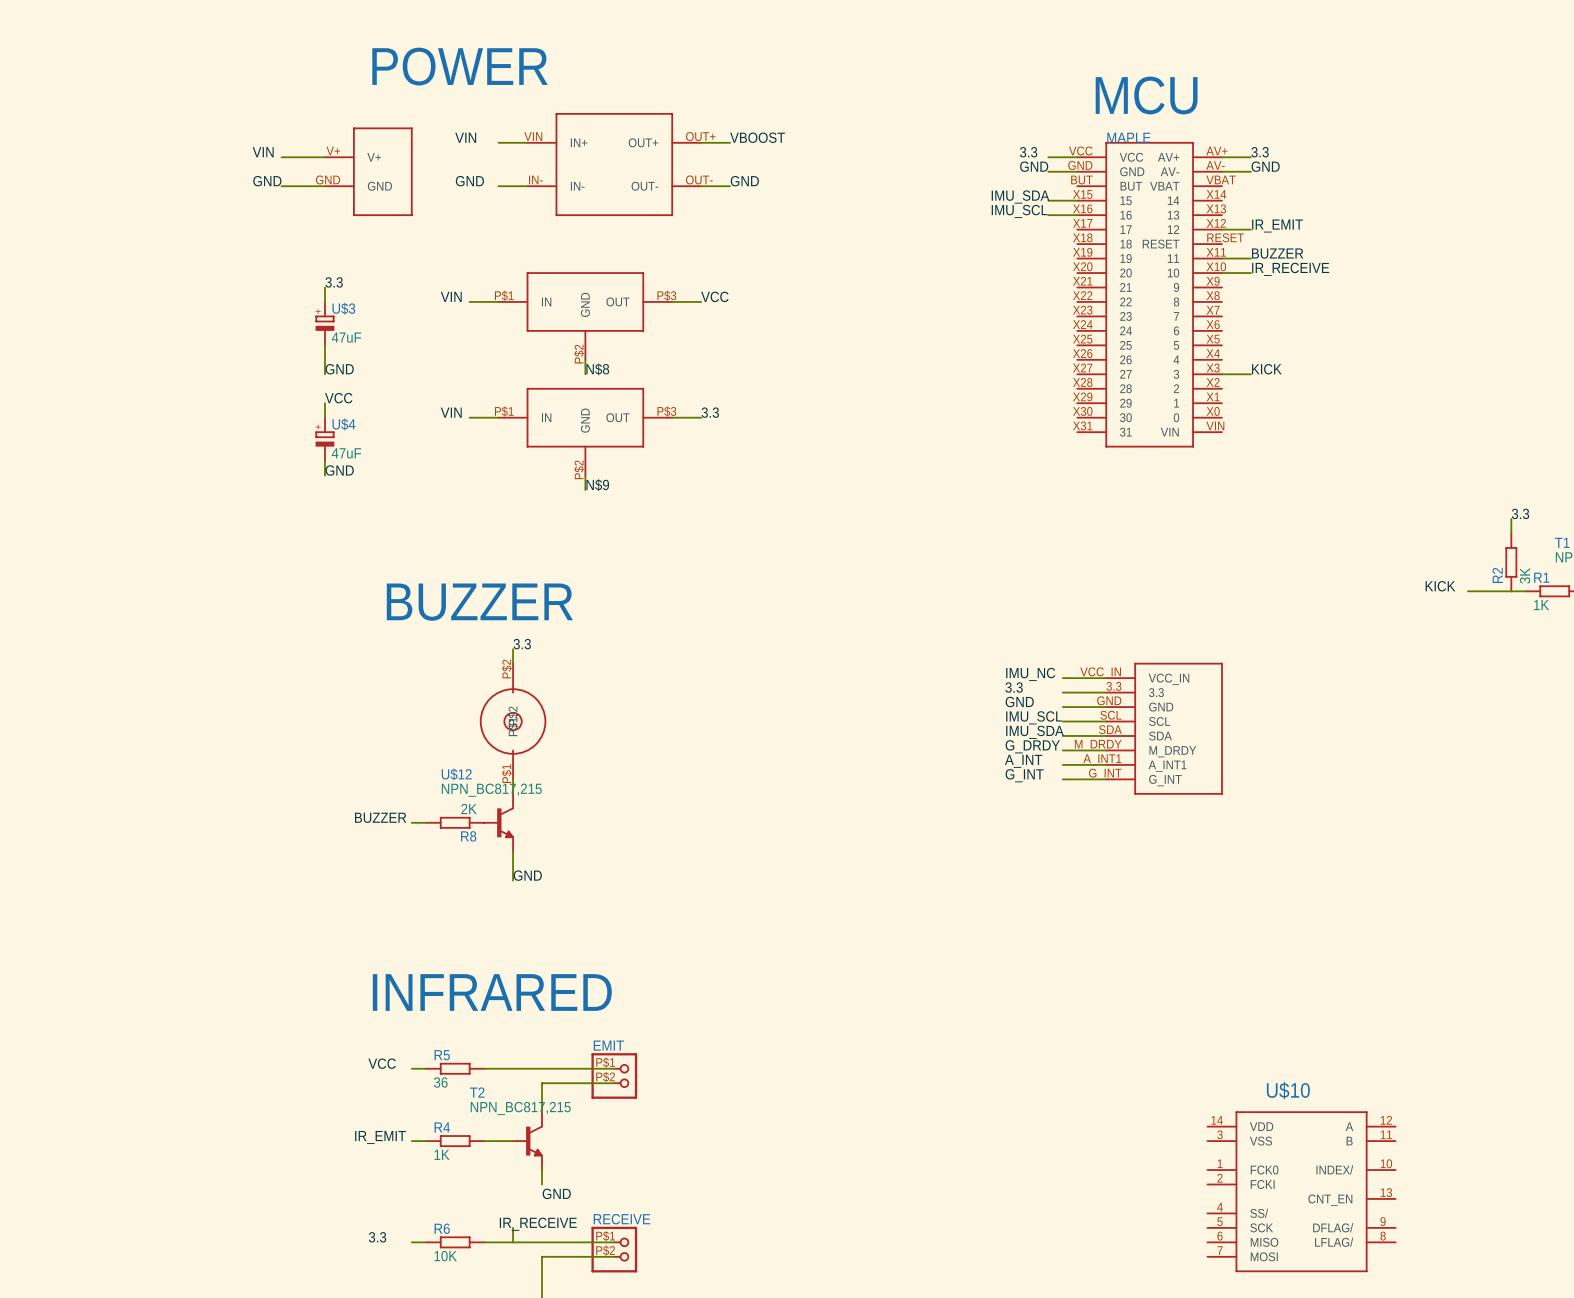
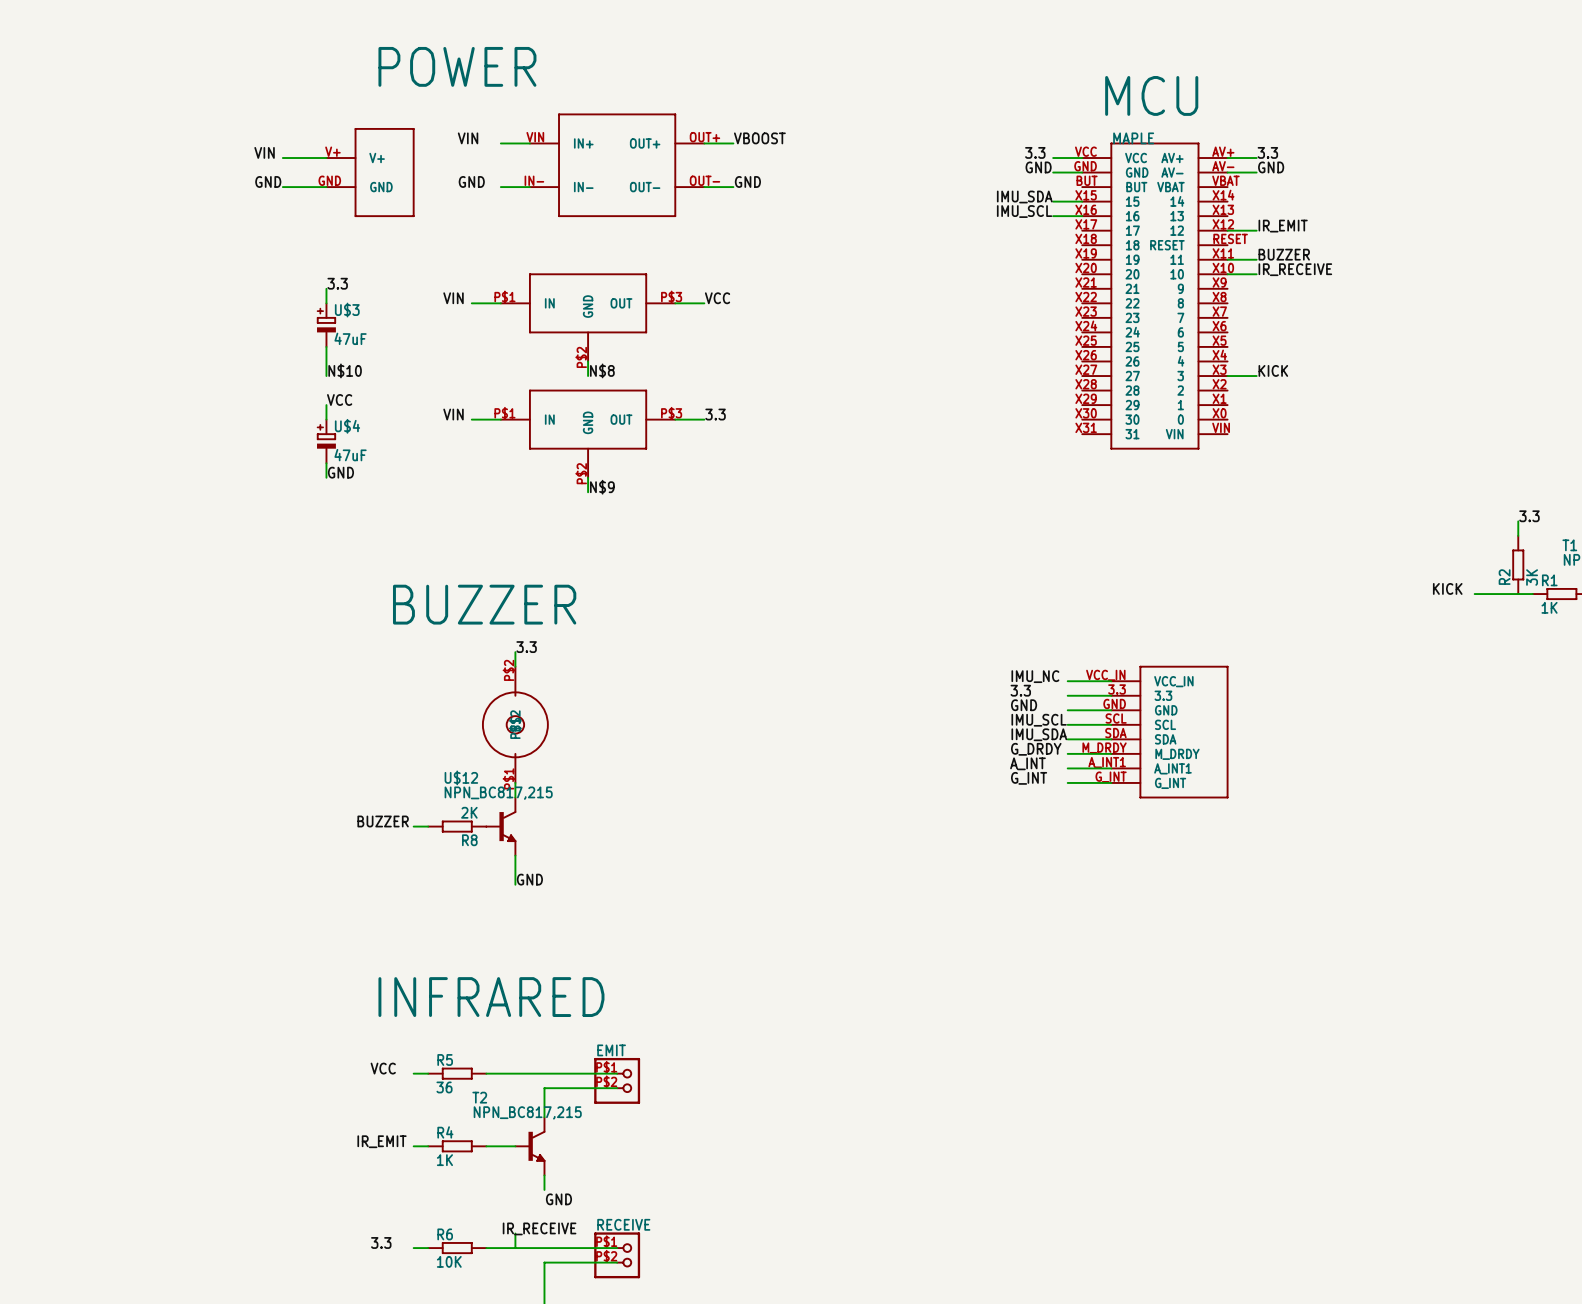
label: GND (339, 369) -> N$10 (345, 370)
U$10: (1301, 1191) -> none

